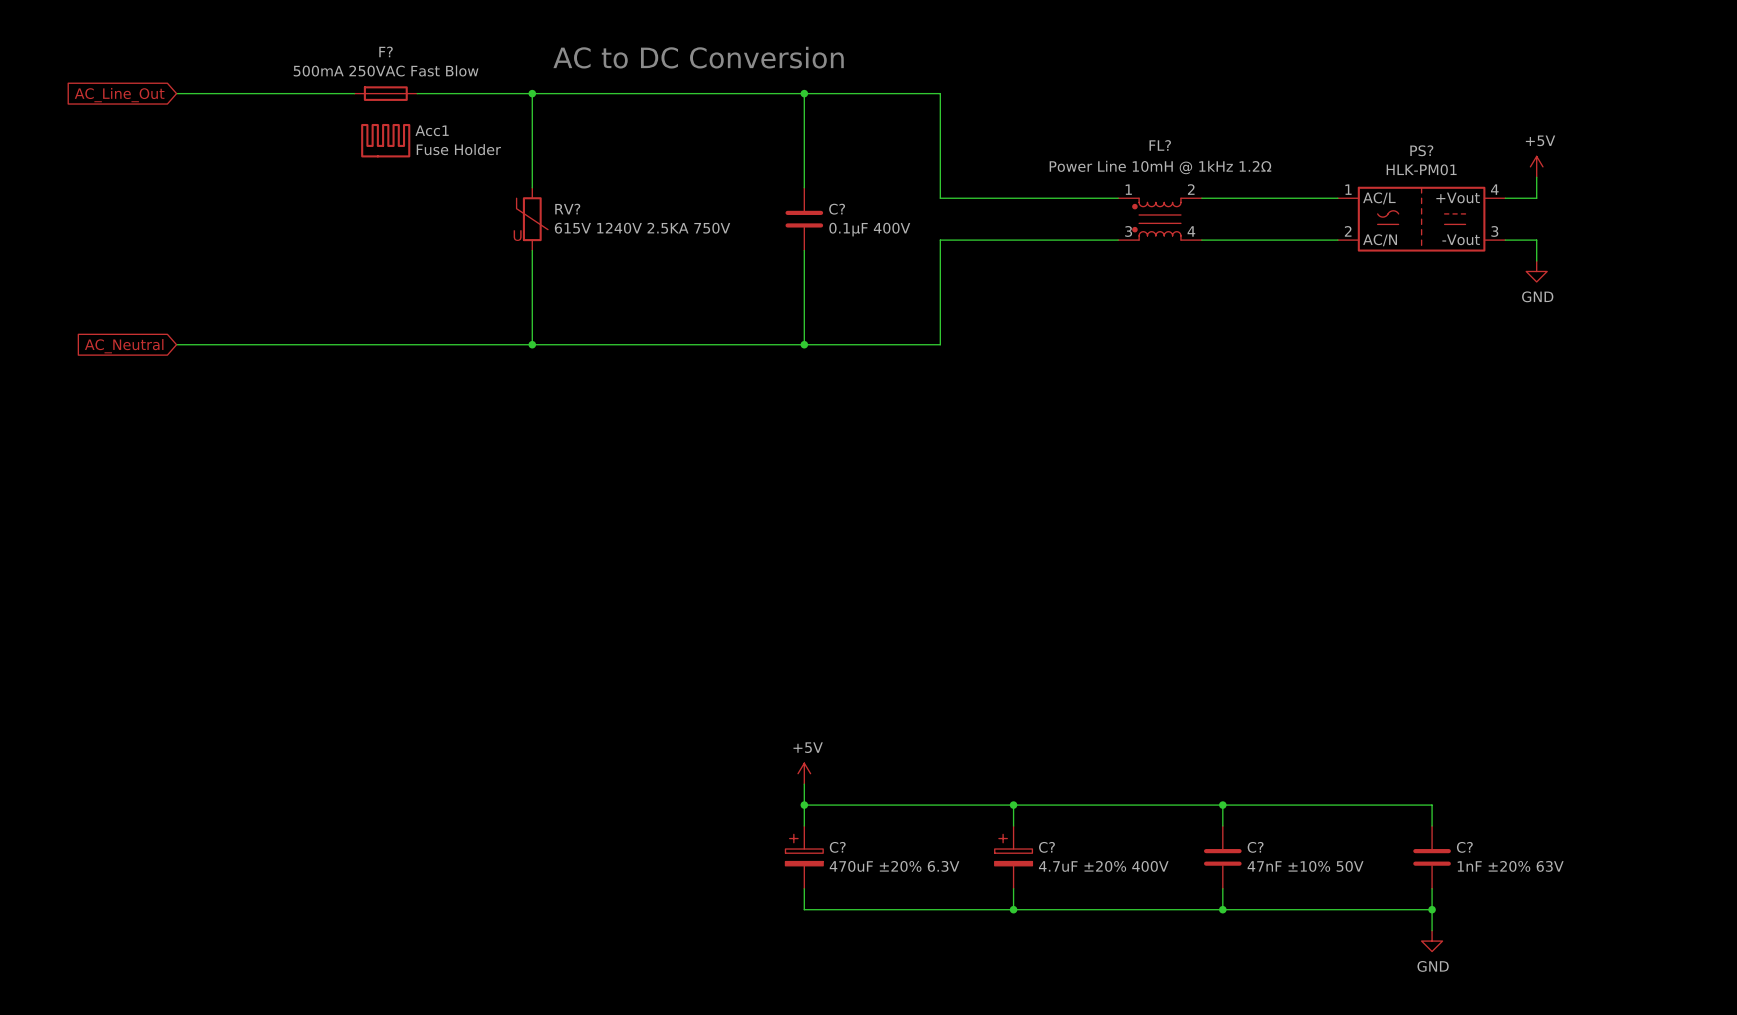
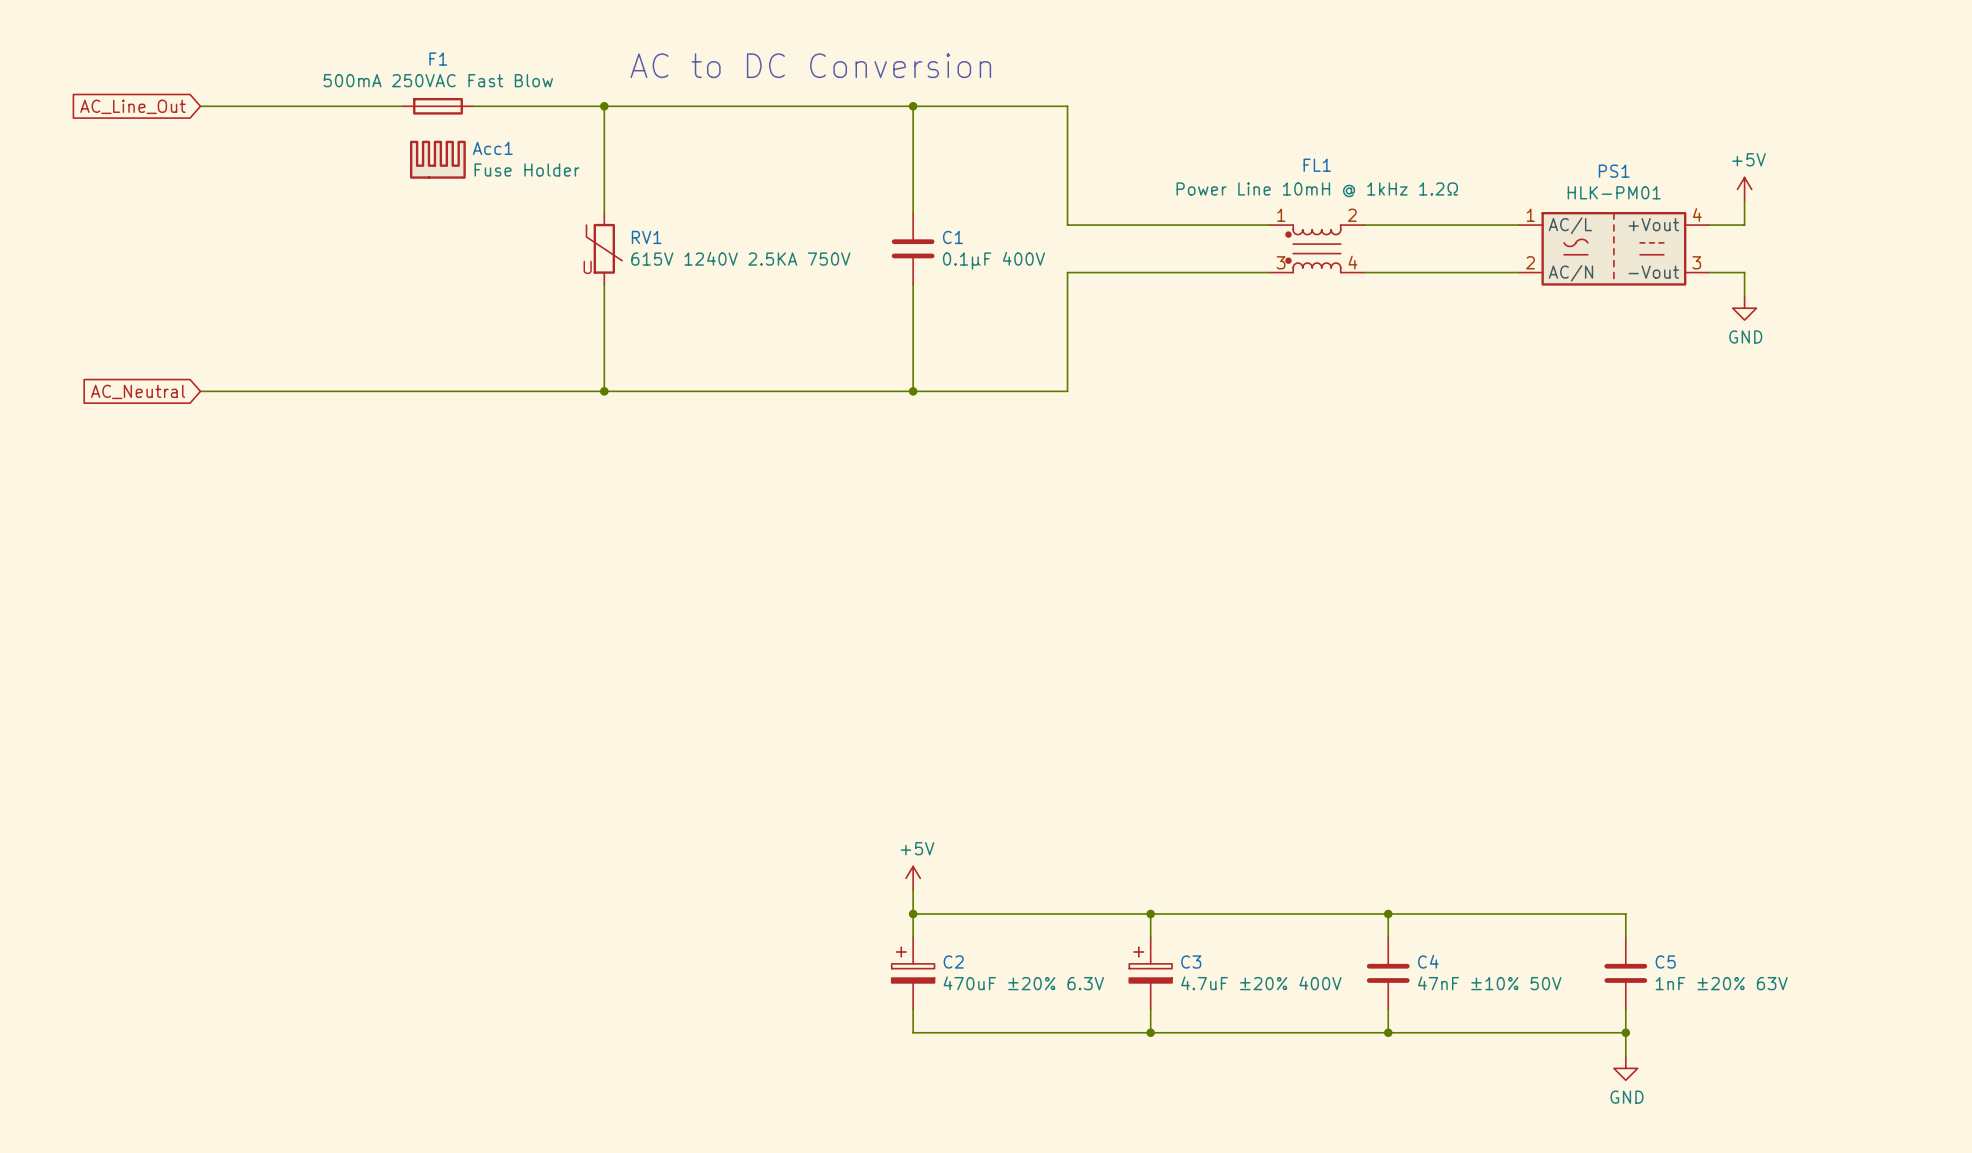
F? name: F? (386, 51) -> F1 (438, 59)
FL? name: FL? (1160, 145) -> FL1 (1317, 165)
PS? name: PS? (1421, 150) -> PS1 (1614, 171)
RV? name: RV? (567, 209) -> RV1 (646, 237)
C? name: C? (837, 209) -> C1 (952, 237)
C? name: C? (837, 847) -> C2 (953, 962)
C? name: C? (1046, 847) -> C3 (1191, 962)
C? name: C? (1255, 847) -> C4 (1428, 961)
C? name: C? (1464, 847) -> C5 (1665, 962)

